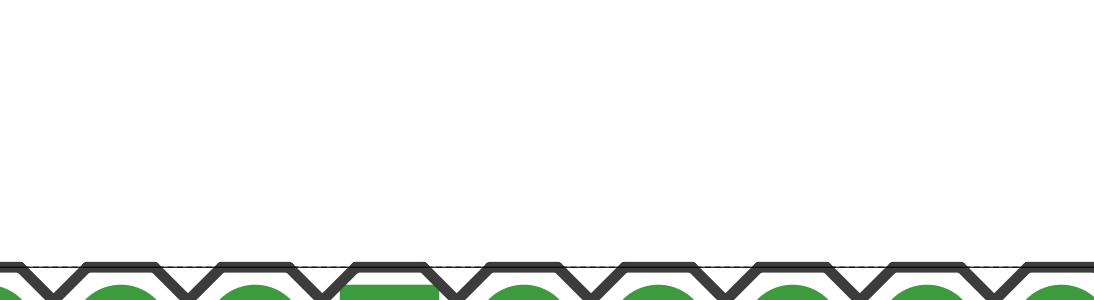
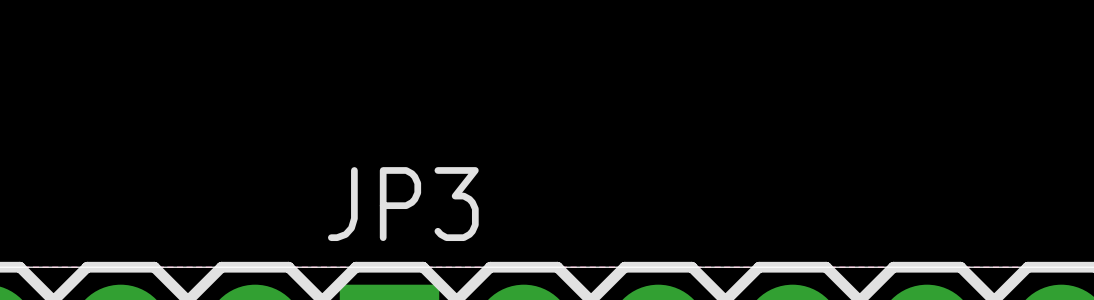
JP3 name: none -> JP3 (403, 204)

